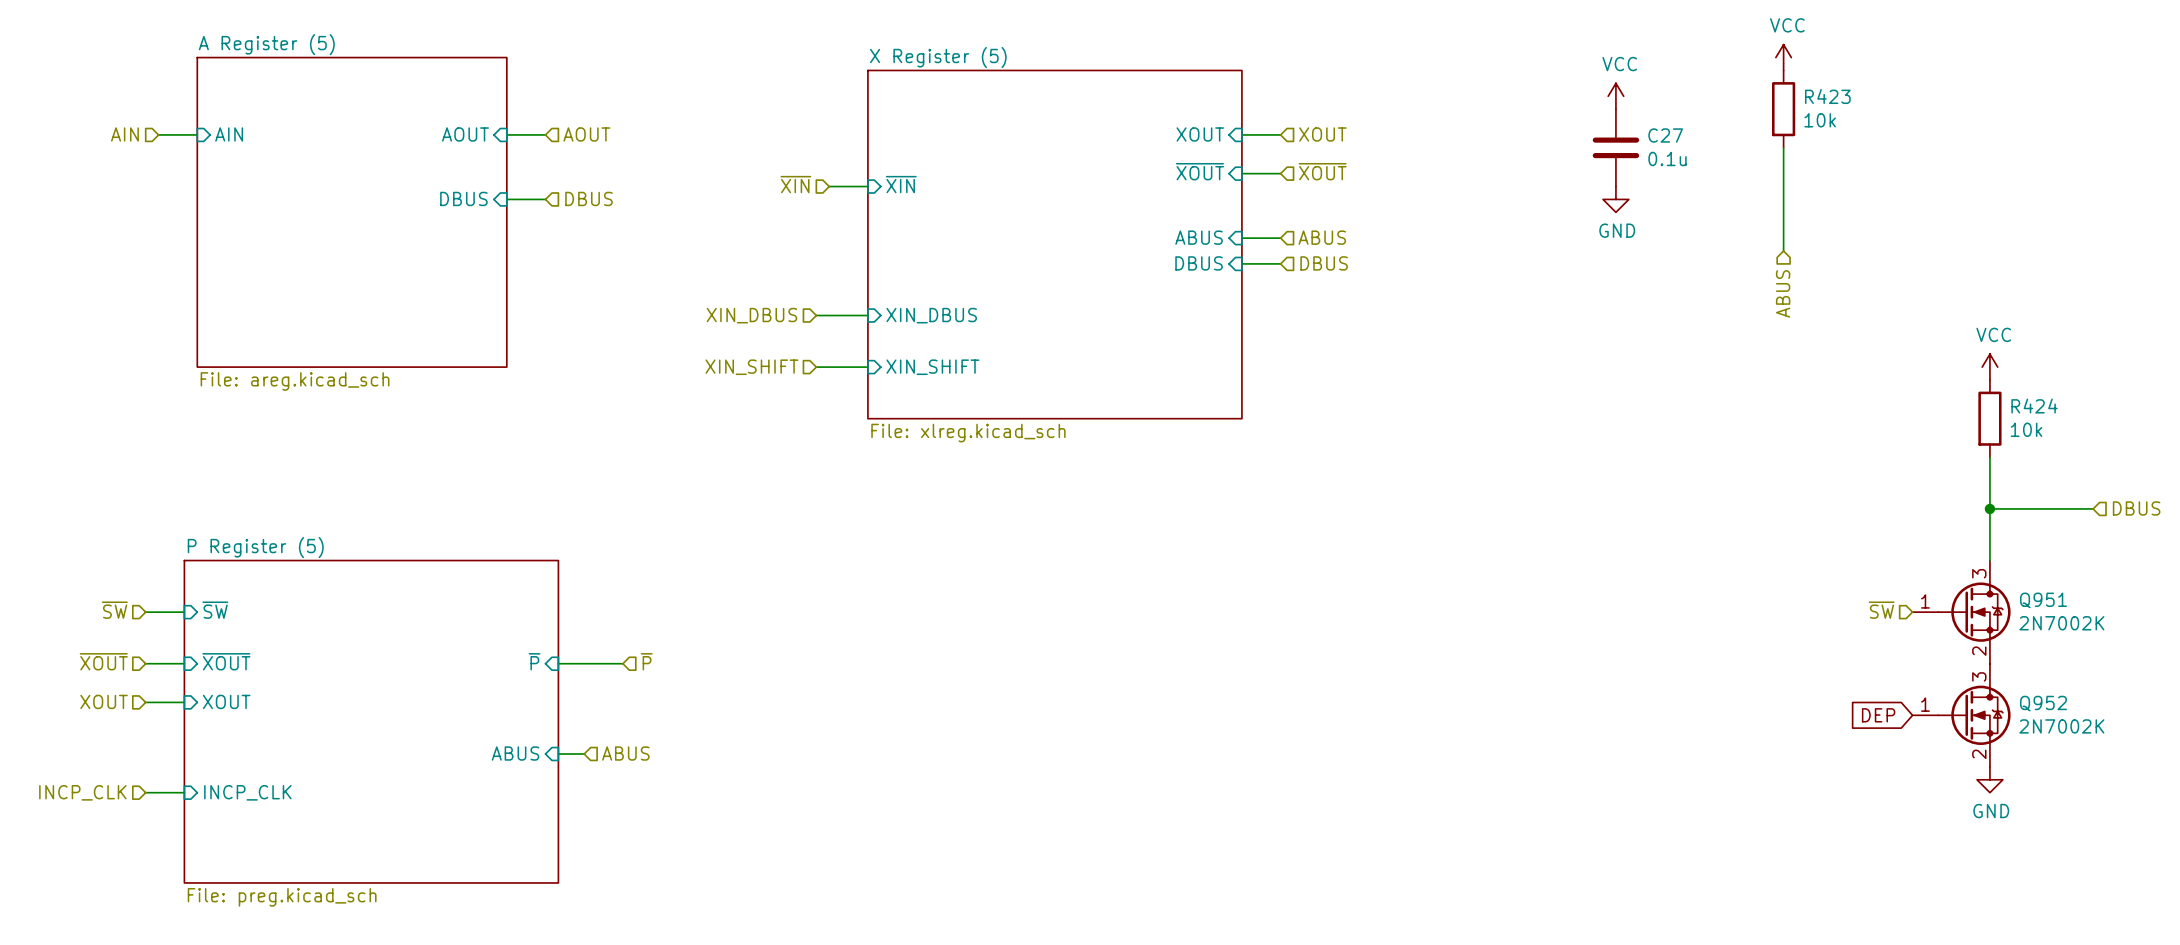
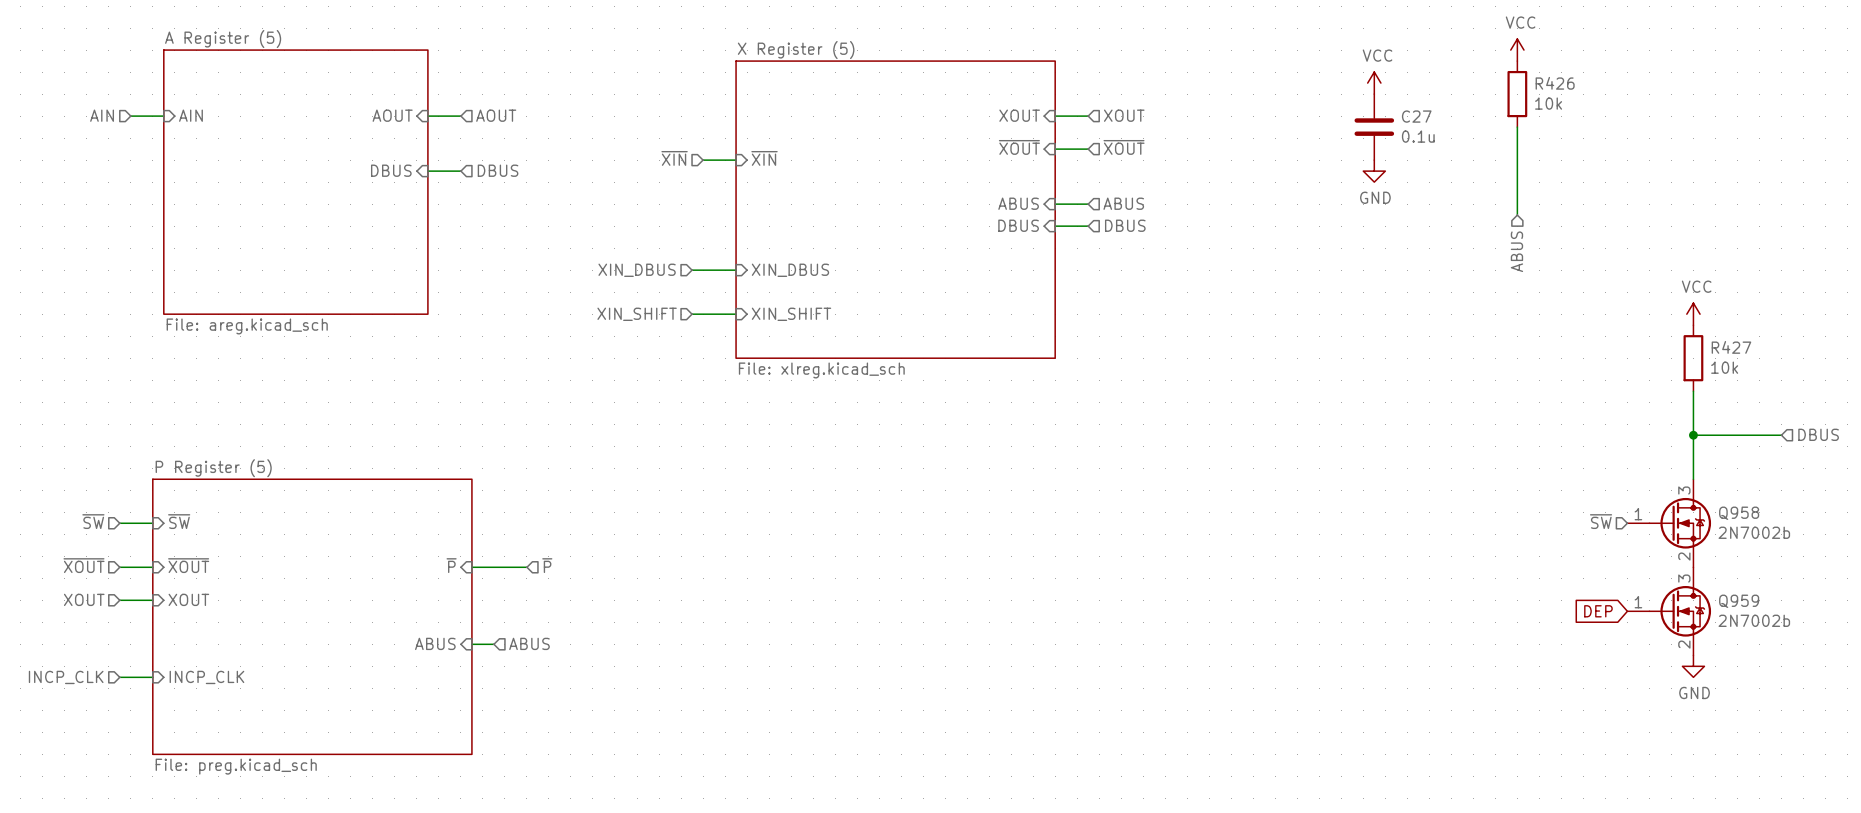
R423 name: R423 (1827, 96) -> R426 (1555, 83)
R424 name: R424 (2034, 406) -> R427 (1731, 347)
Q951 name: Q951 (2043, 600) -> Q958 (1739, 513)
Q951 value: 2N7002K (2061, 623) -> 2N7002b (1754, 532)
Q952 name: Q952 (2043, 703) -> Q959 (1739, 601)
Q952 value: 2N7002K (2061, 726) -> 2N7002b (1754, 620)

